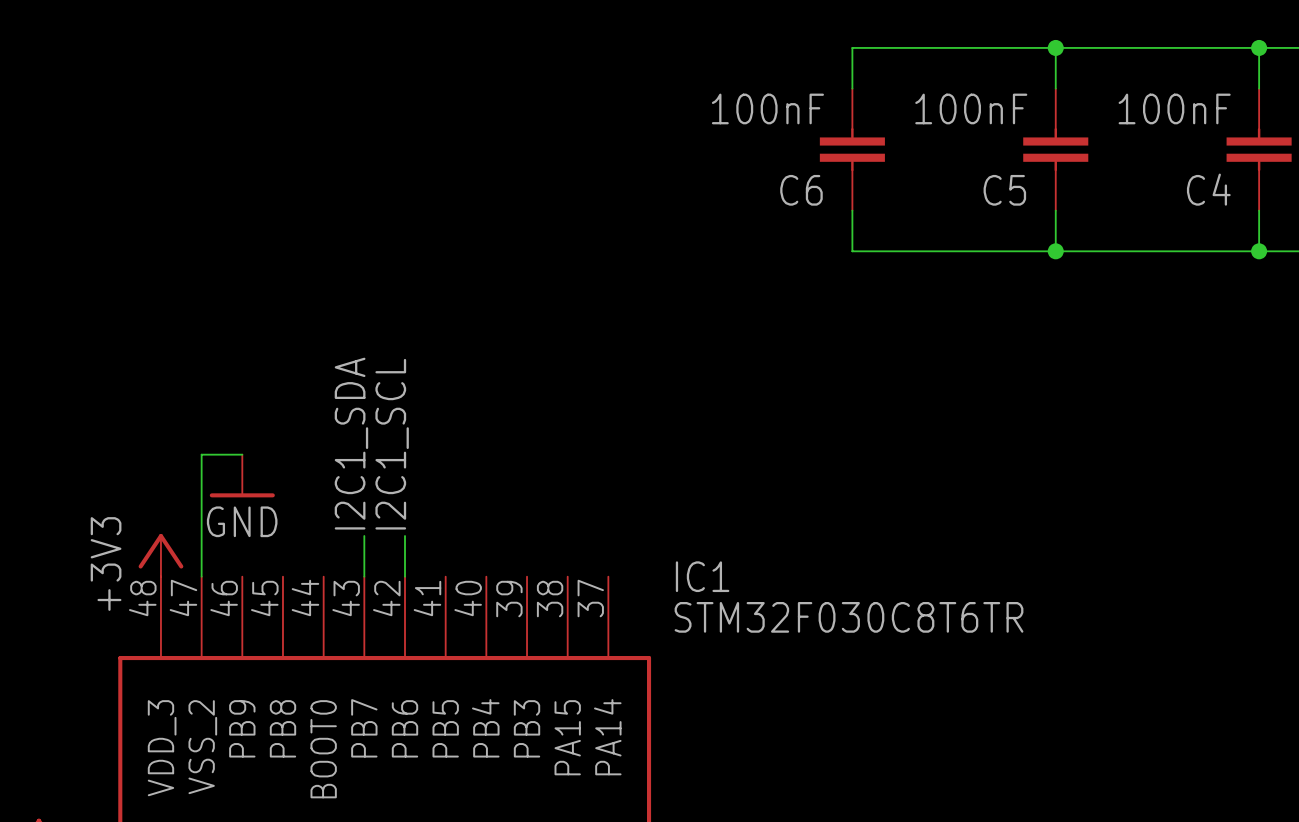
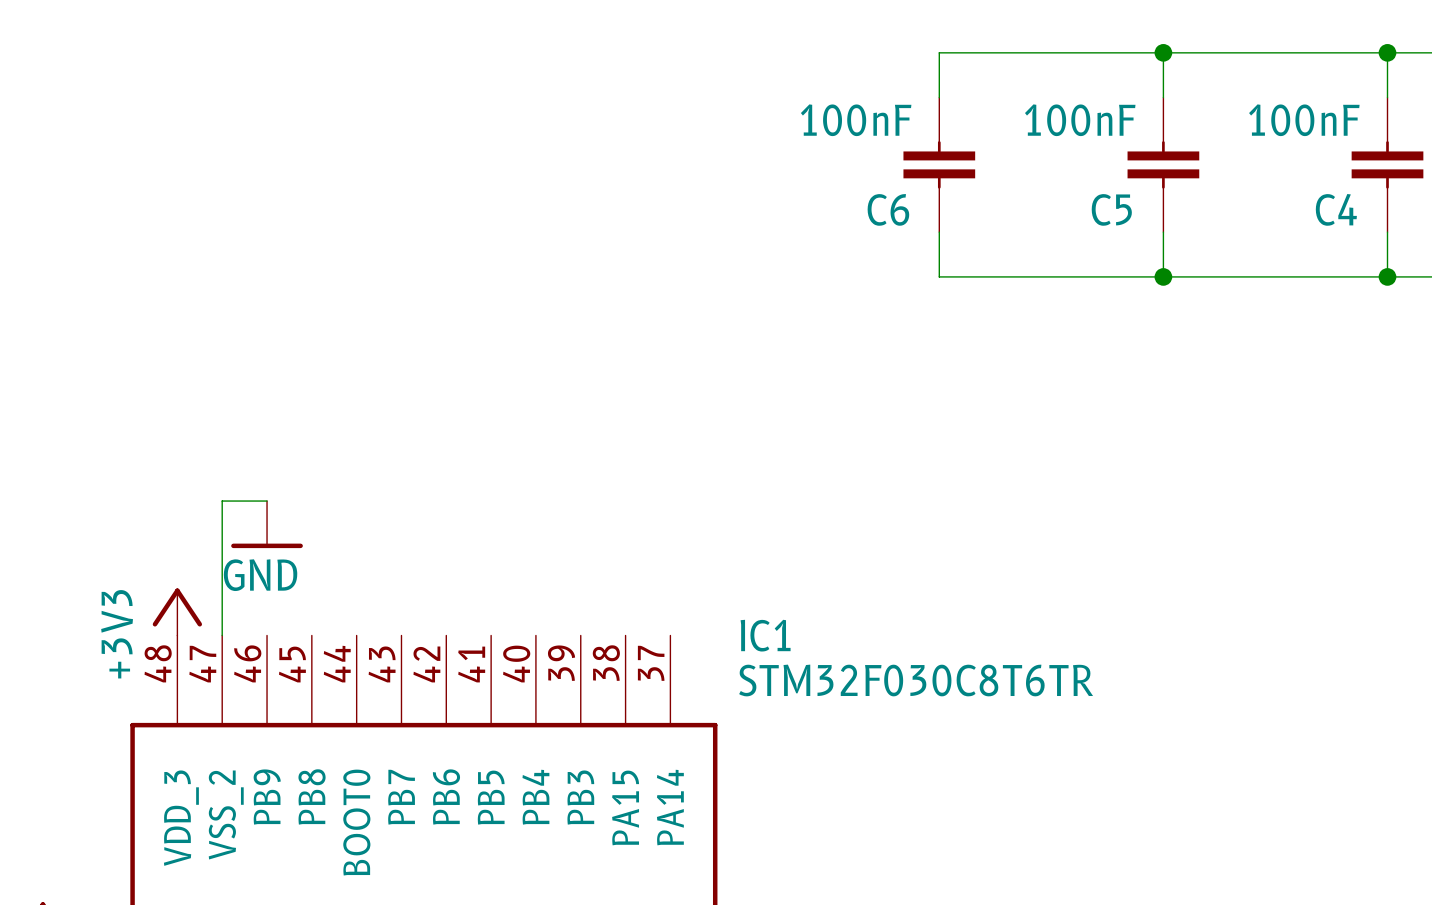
label: I2C1_SDA (351, 443) -> none
label: I2C1_SCL (392, 444) -> none
wire: (364, 536) (364, 576) -> none
wire: (405, 536) (405, 576) -> none

